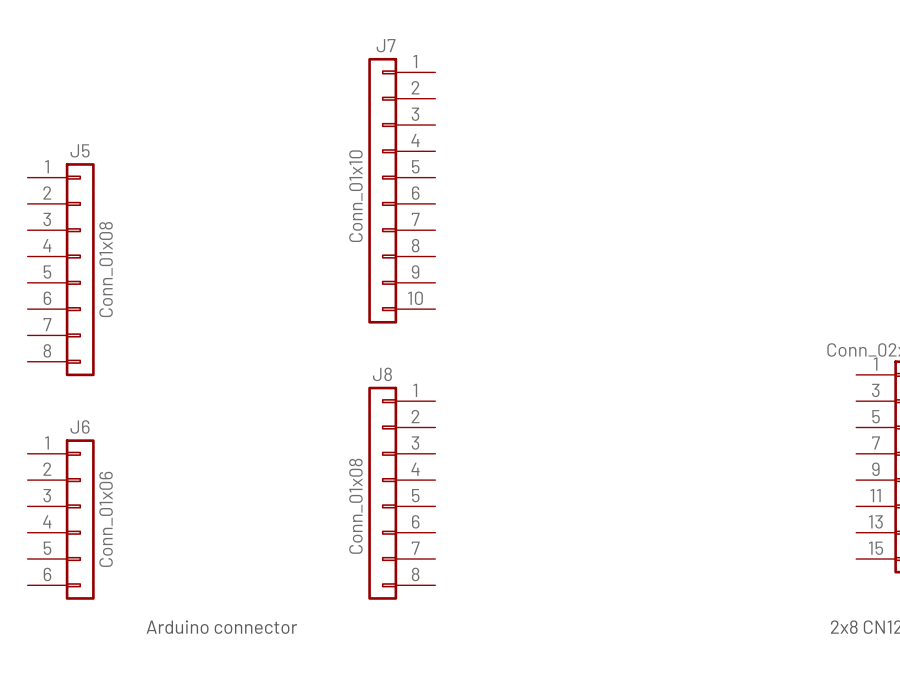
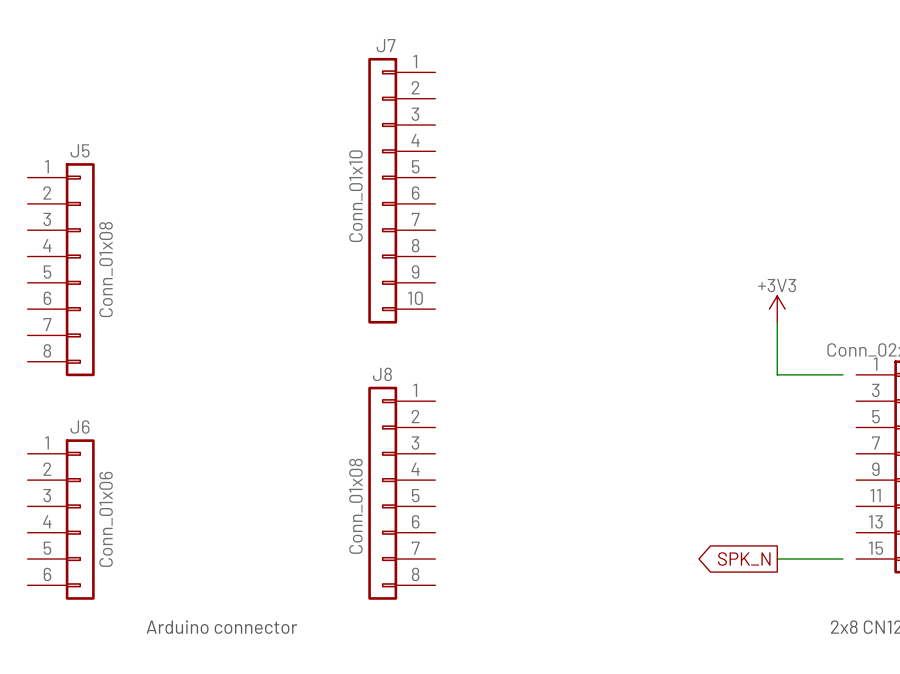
power symbol: none -> +3V3 (777, 309)
wire: none -> (777, 322) (777, 374) (843, 374)
global label: none -> SPK_N (744, 559)
wire: none -> (777, 559) (843, 559)

